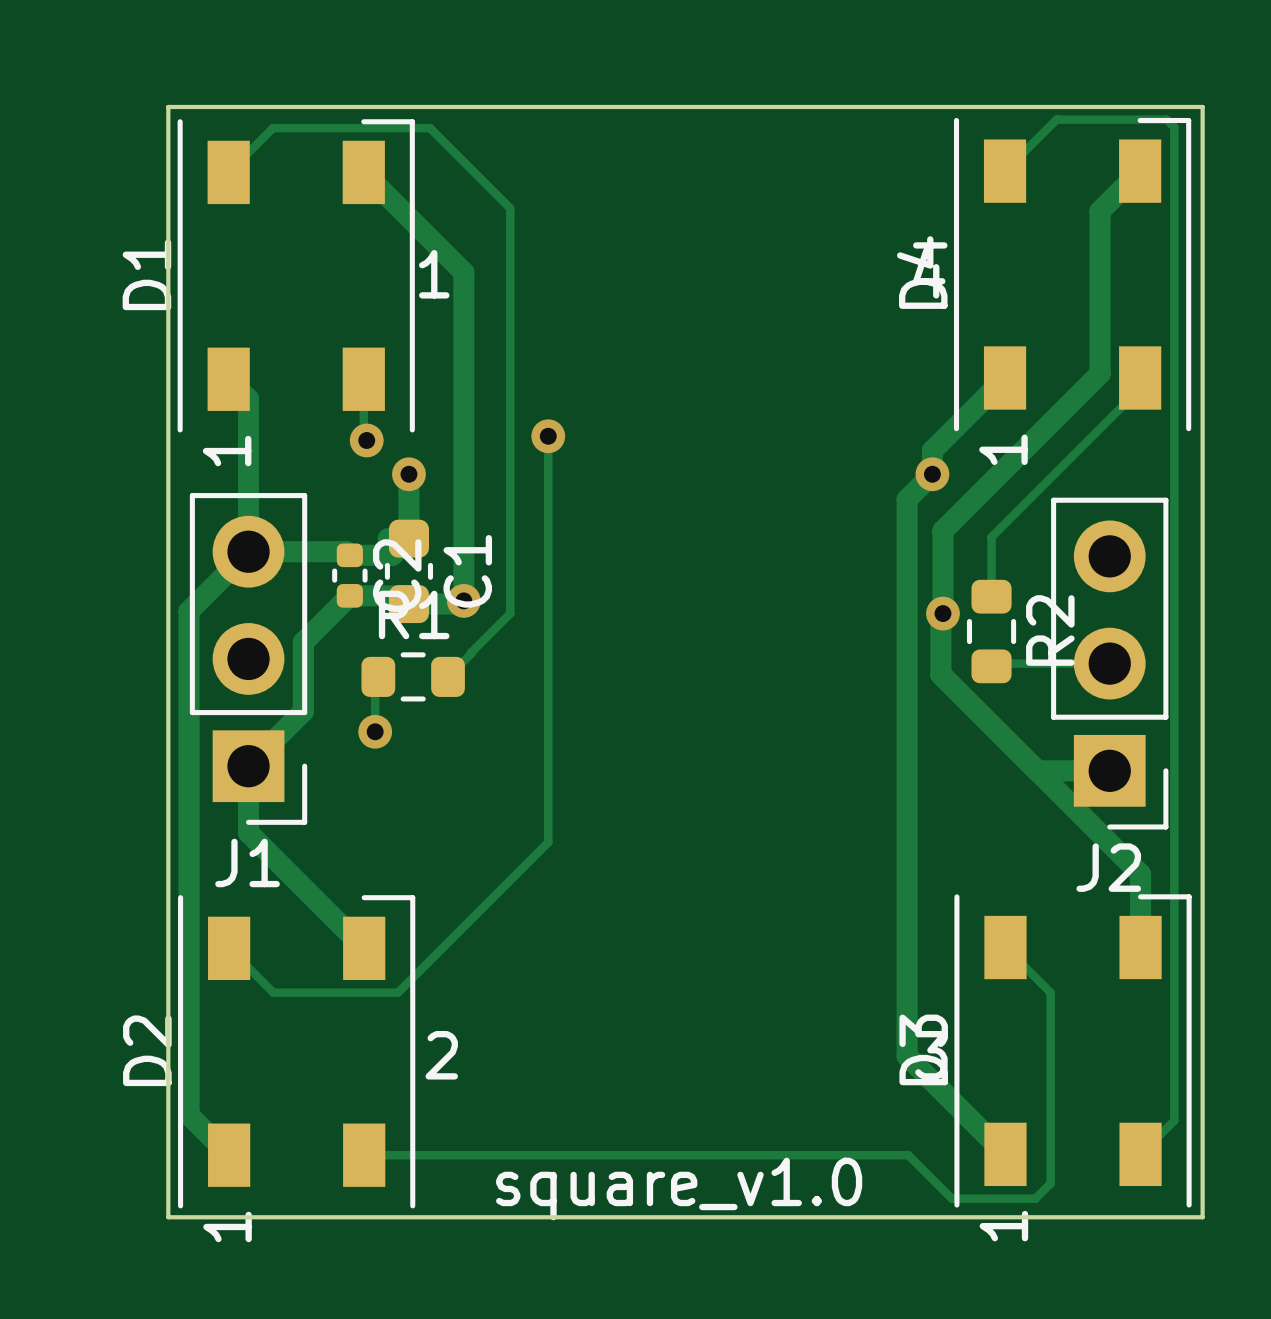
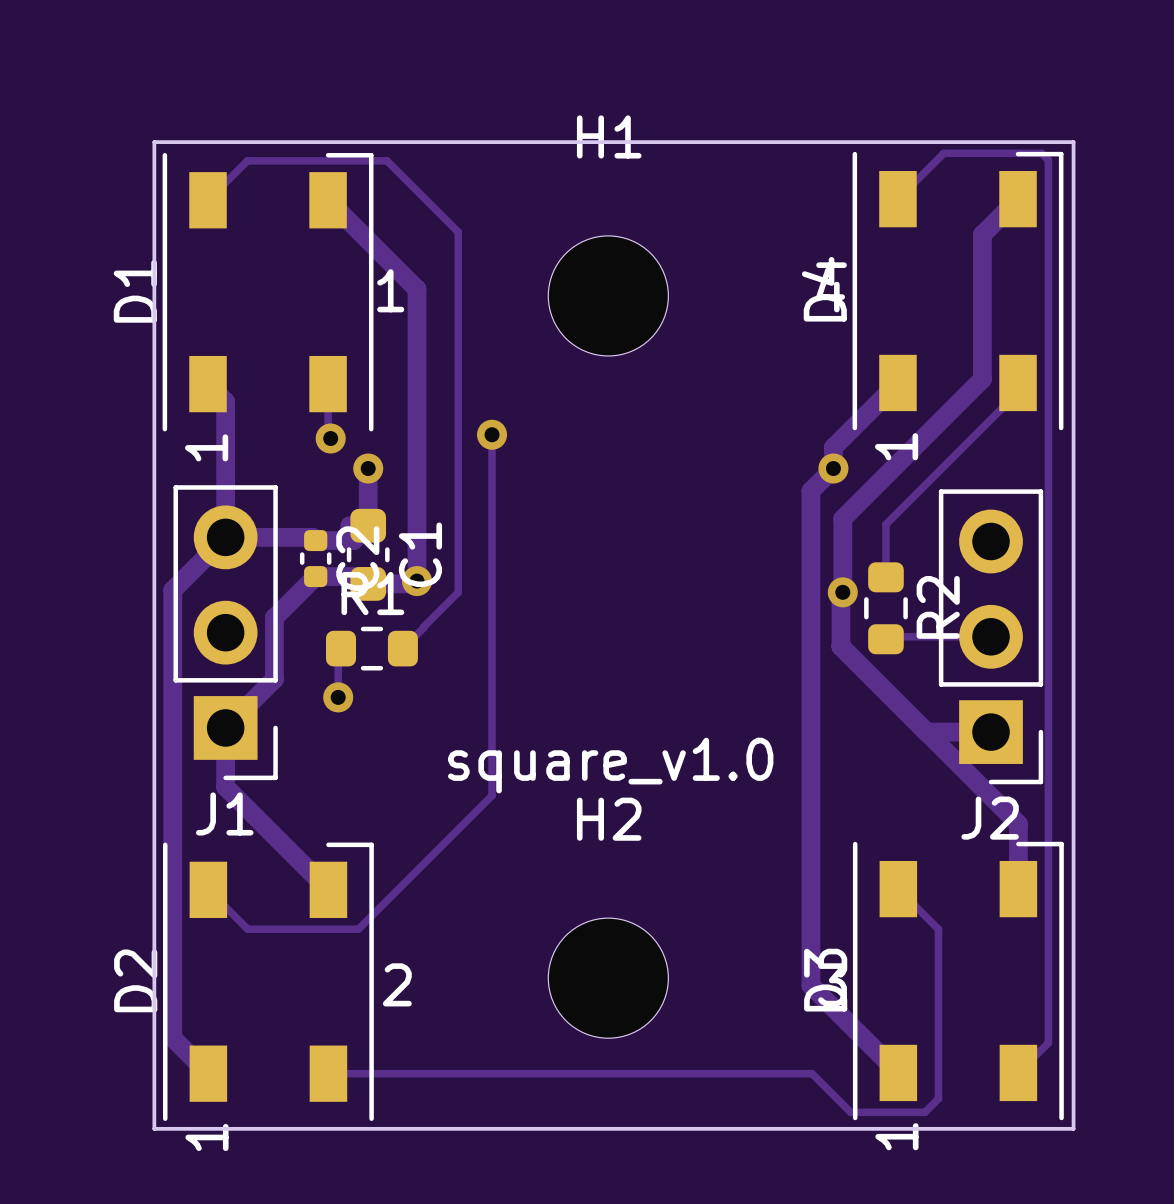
H1: none -> (608, 295)
H2: none -> (608, 978)
text position: square_v1.0 (679, 1188) -> square_v1.0 (610, 765)

